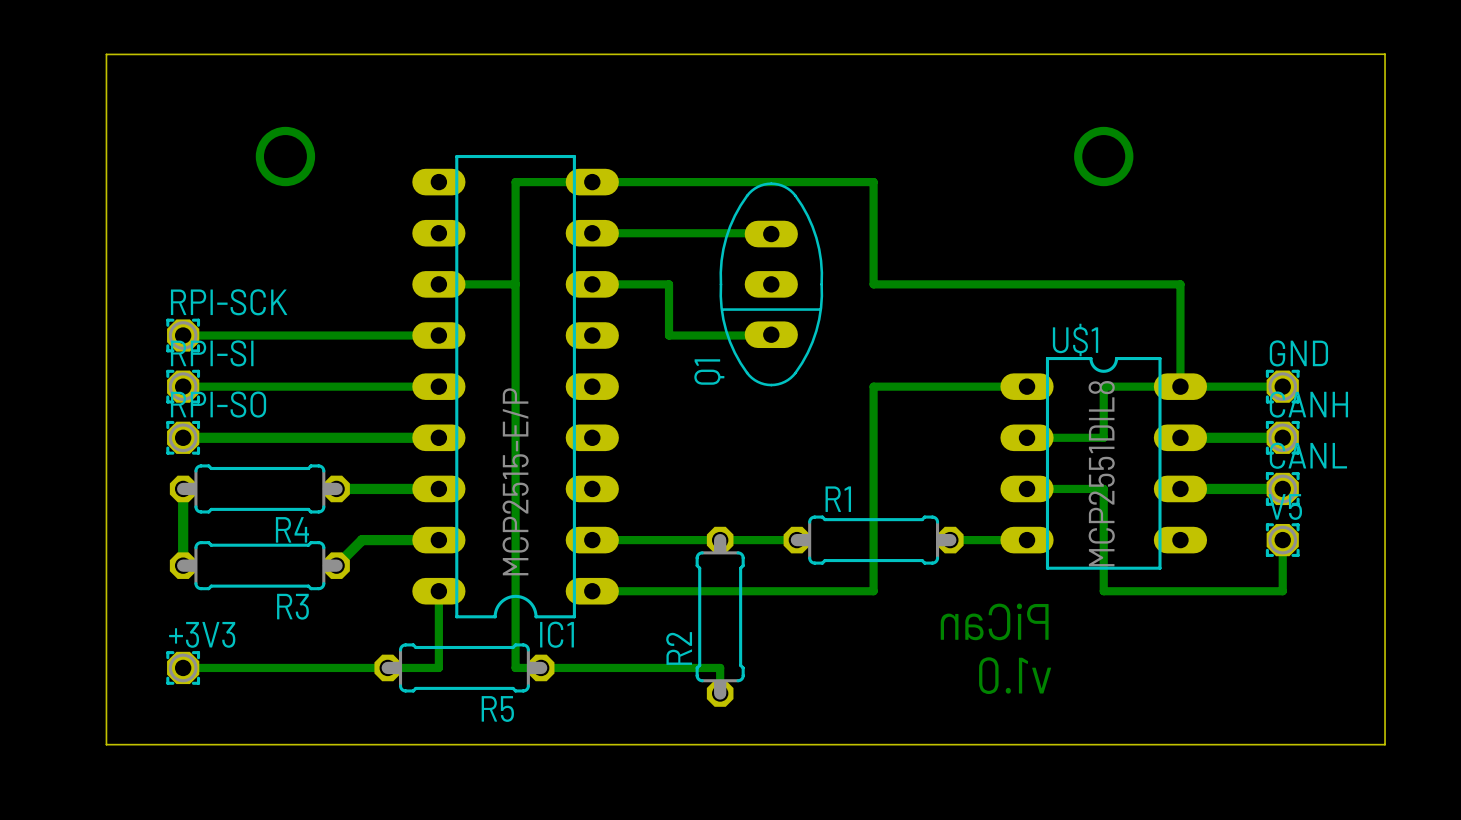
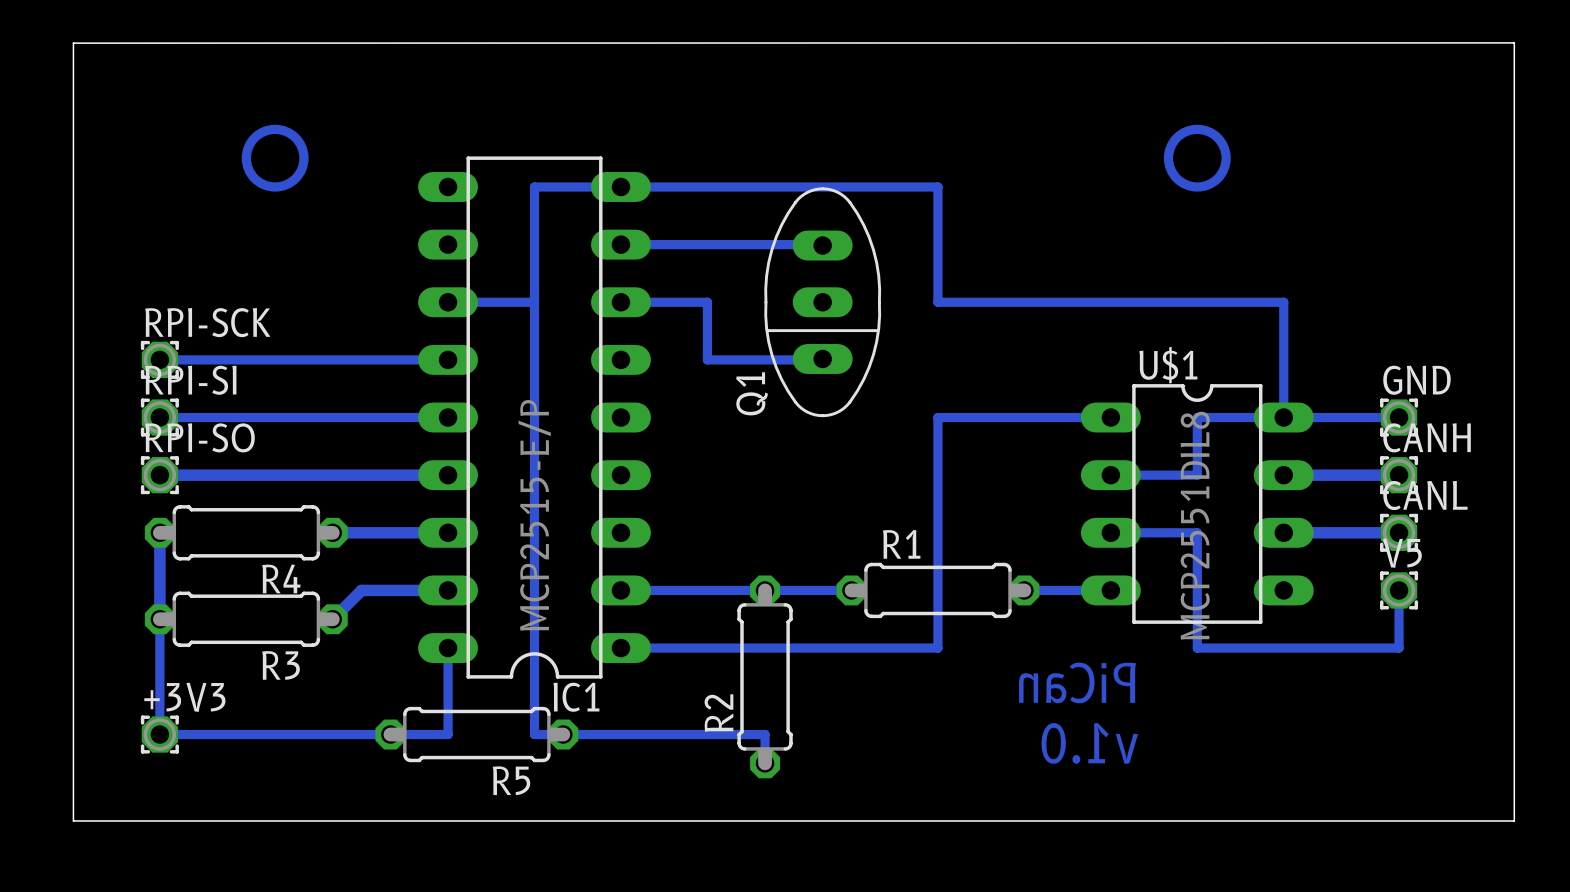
bottom track: none -> (159, 619) (159, 734)

